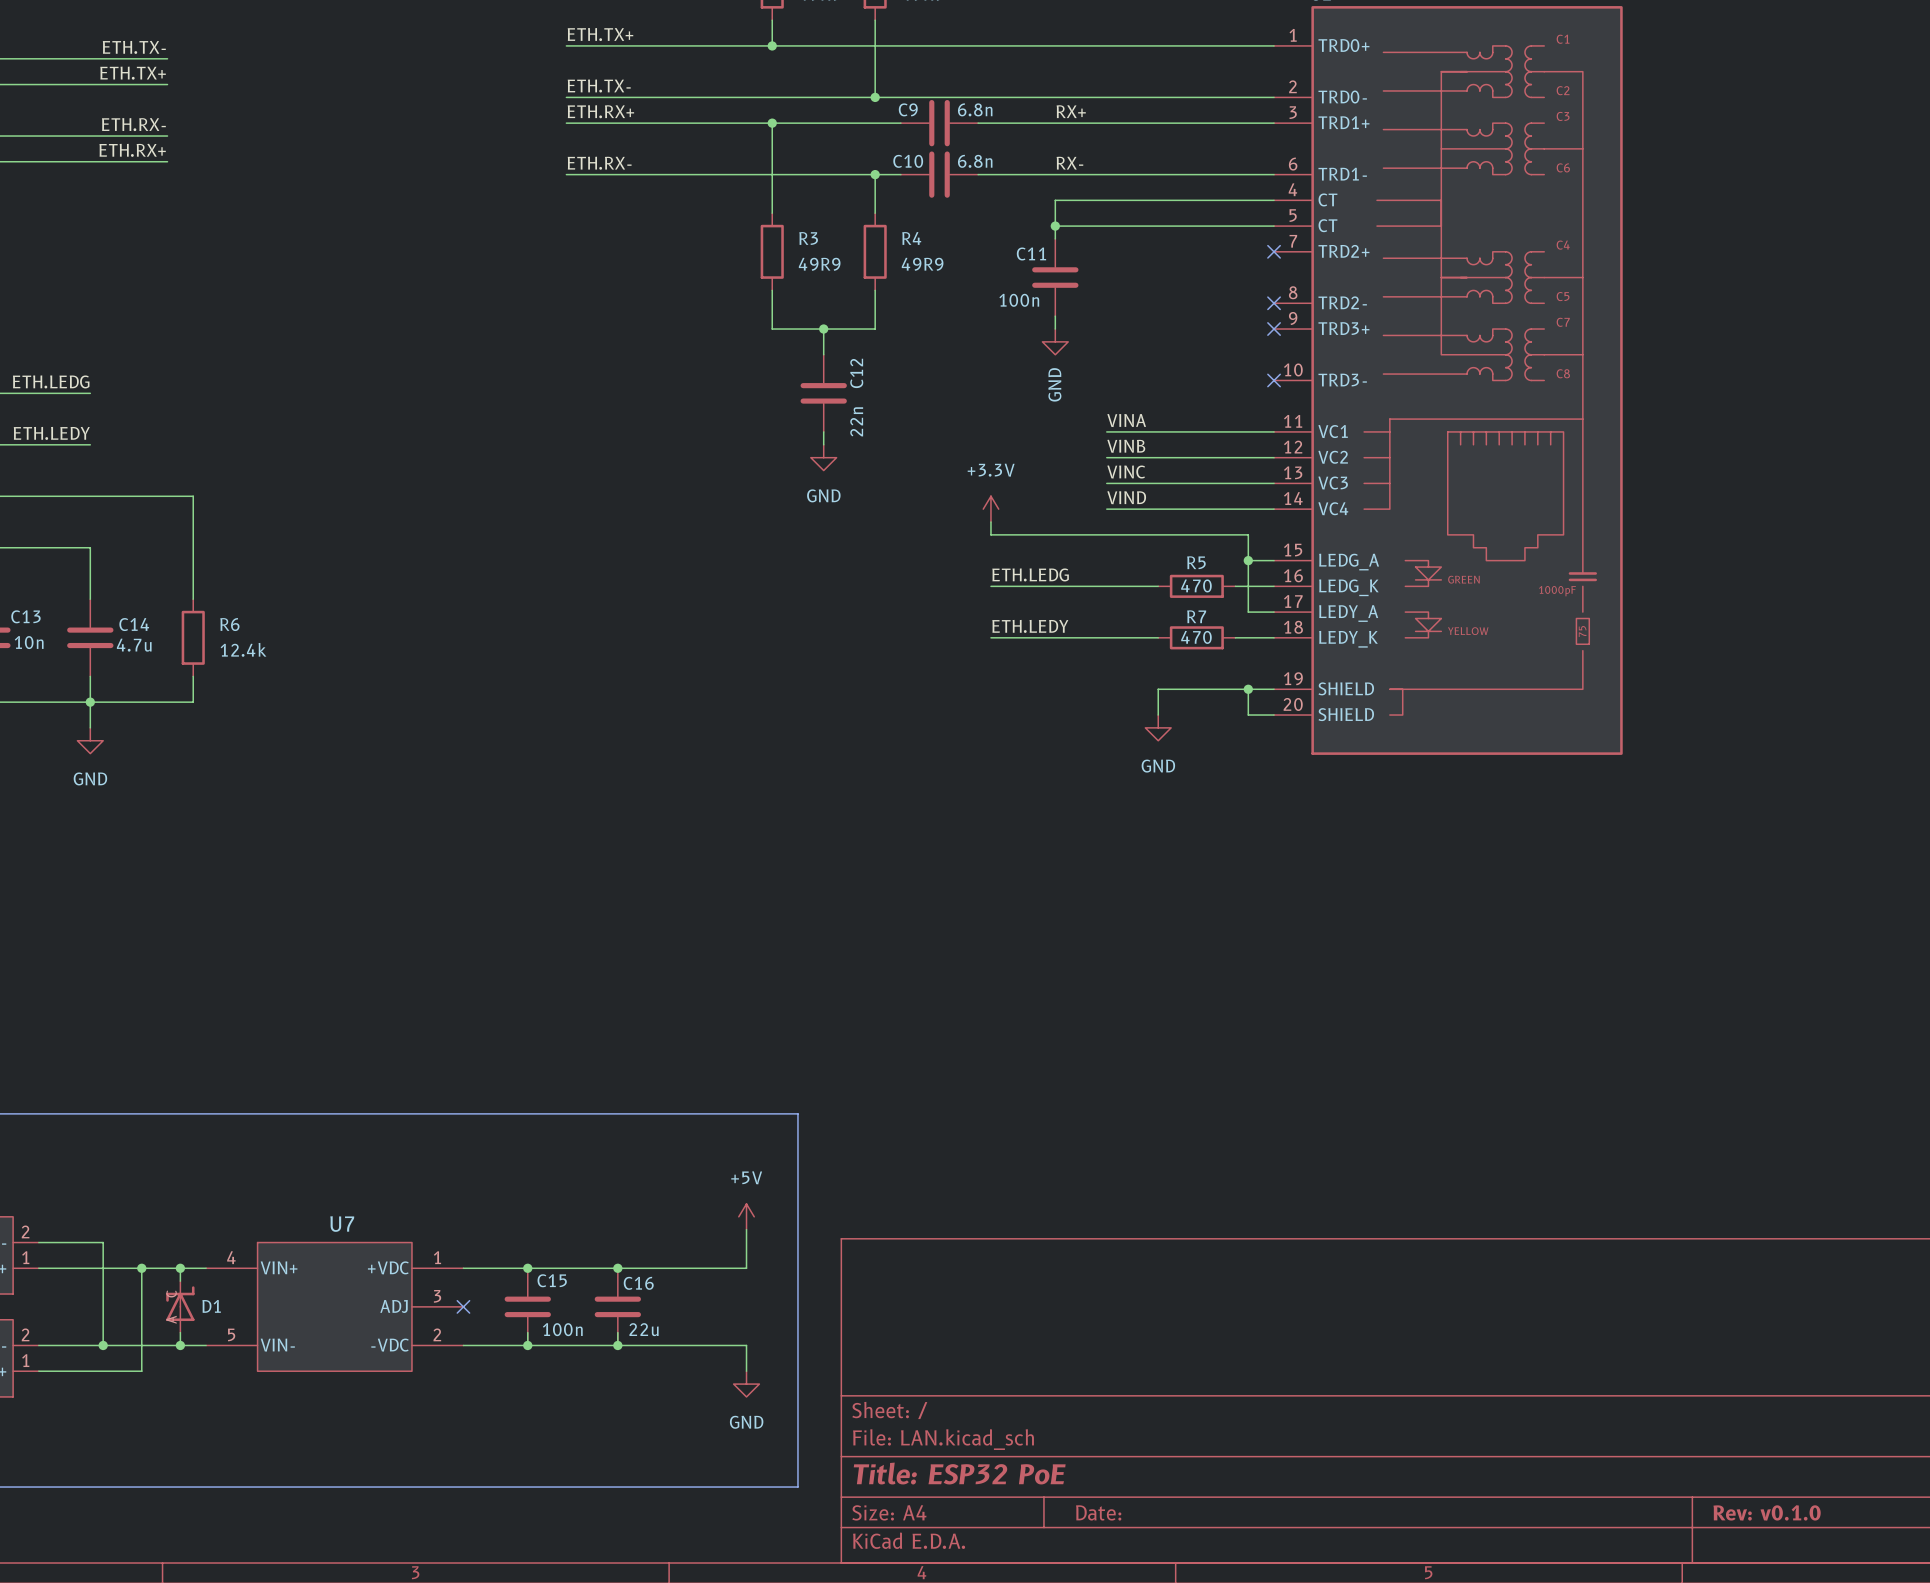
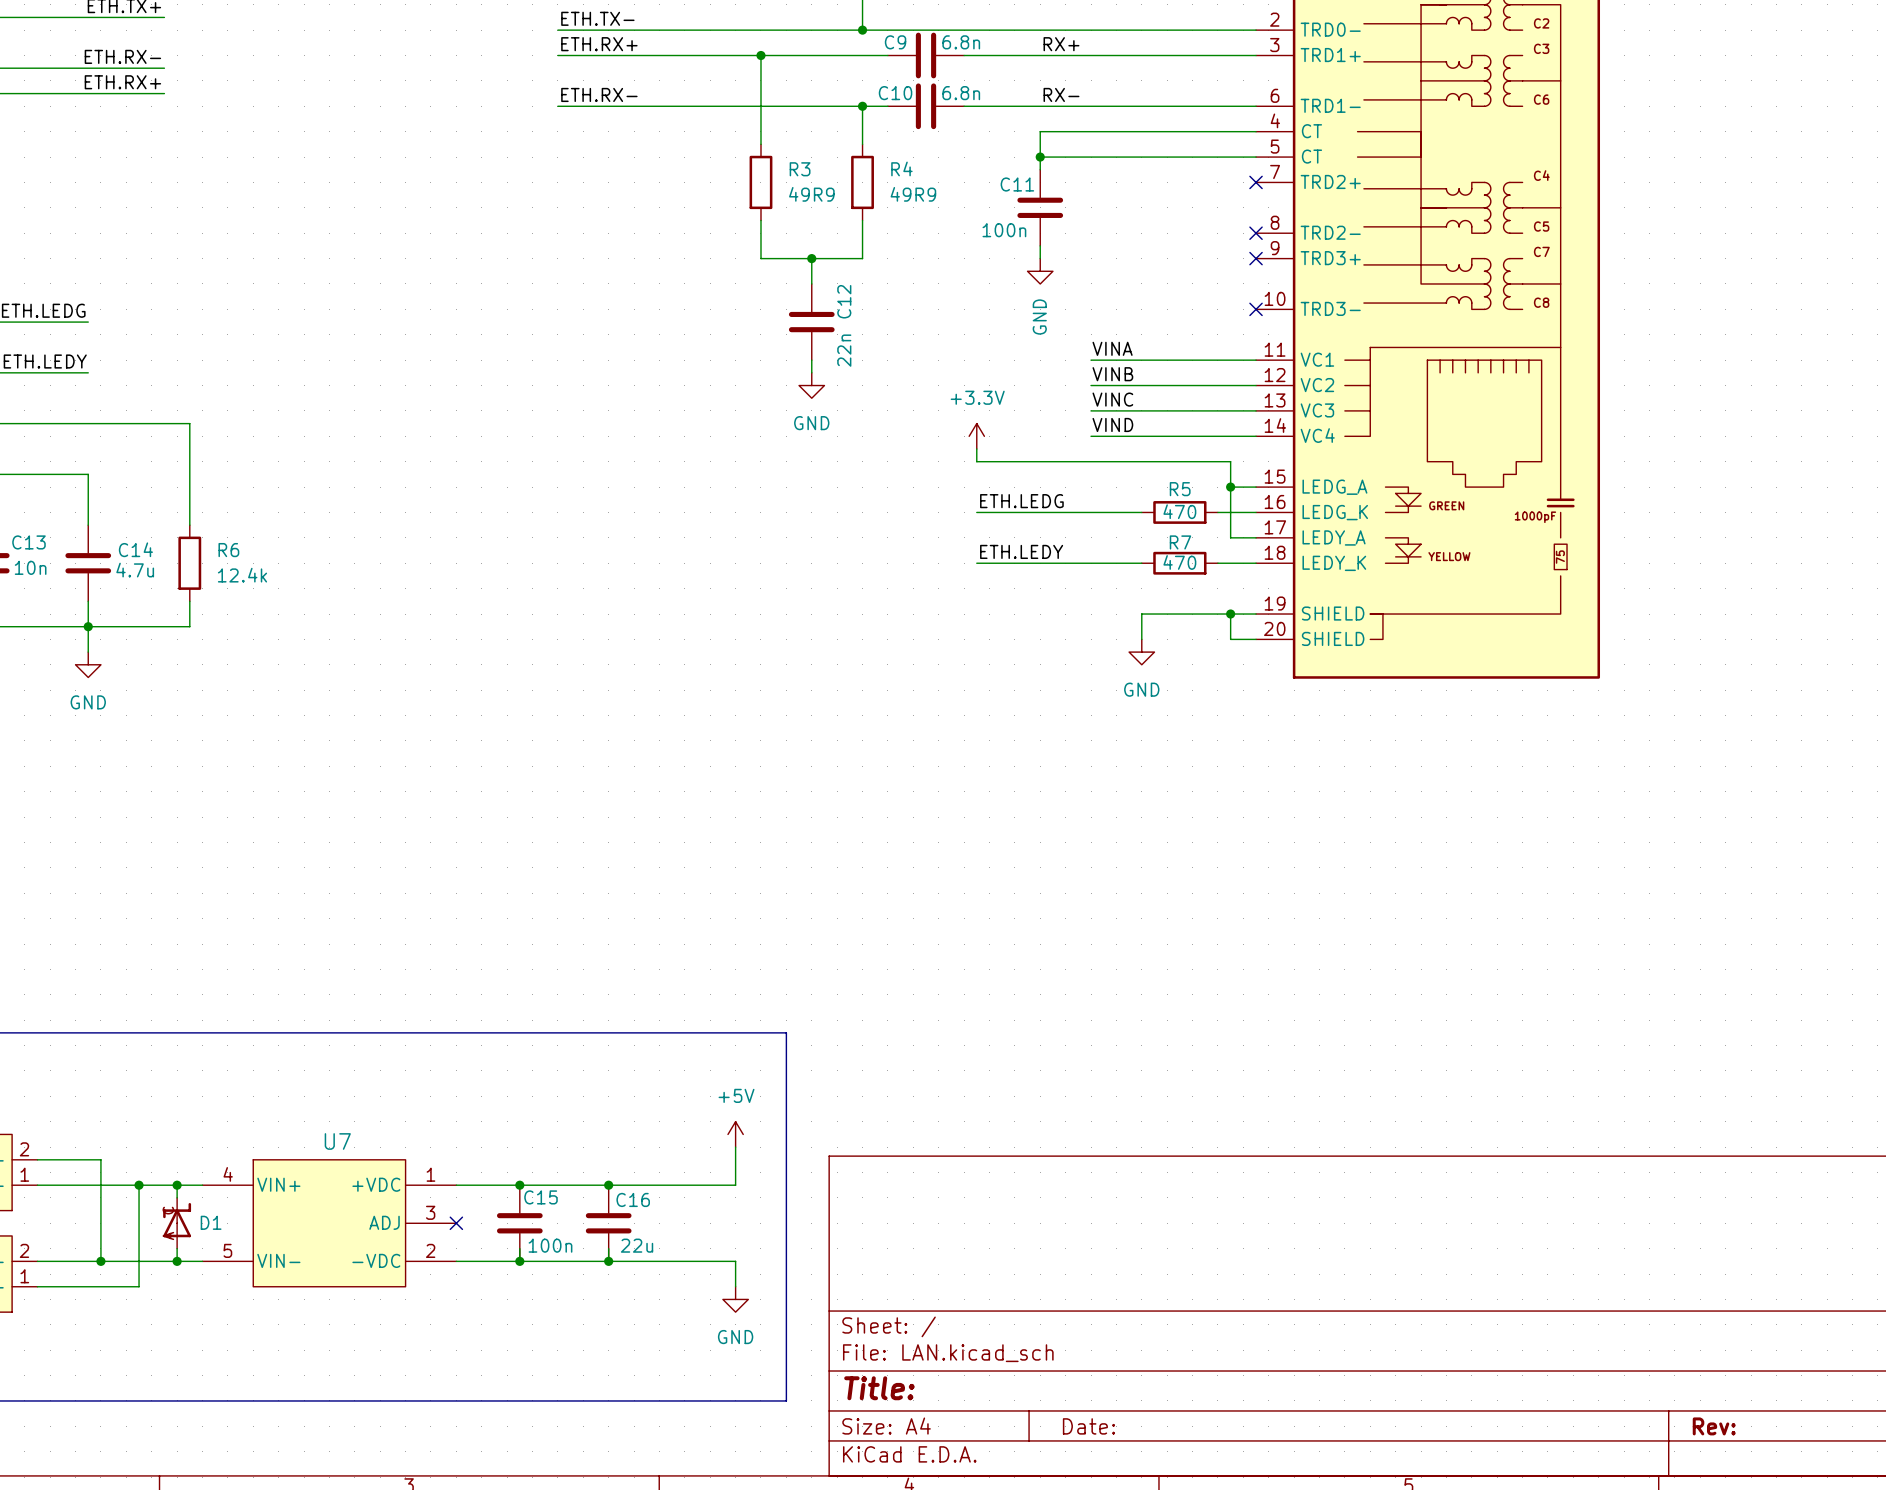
title block: Title: ESP32 PoE (959, 1473) -> Title: (879, 1388)
title block: Rev: v0.1.0 (1767, 1512) -> Rev: (1714, 1426)

